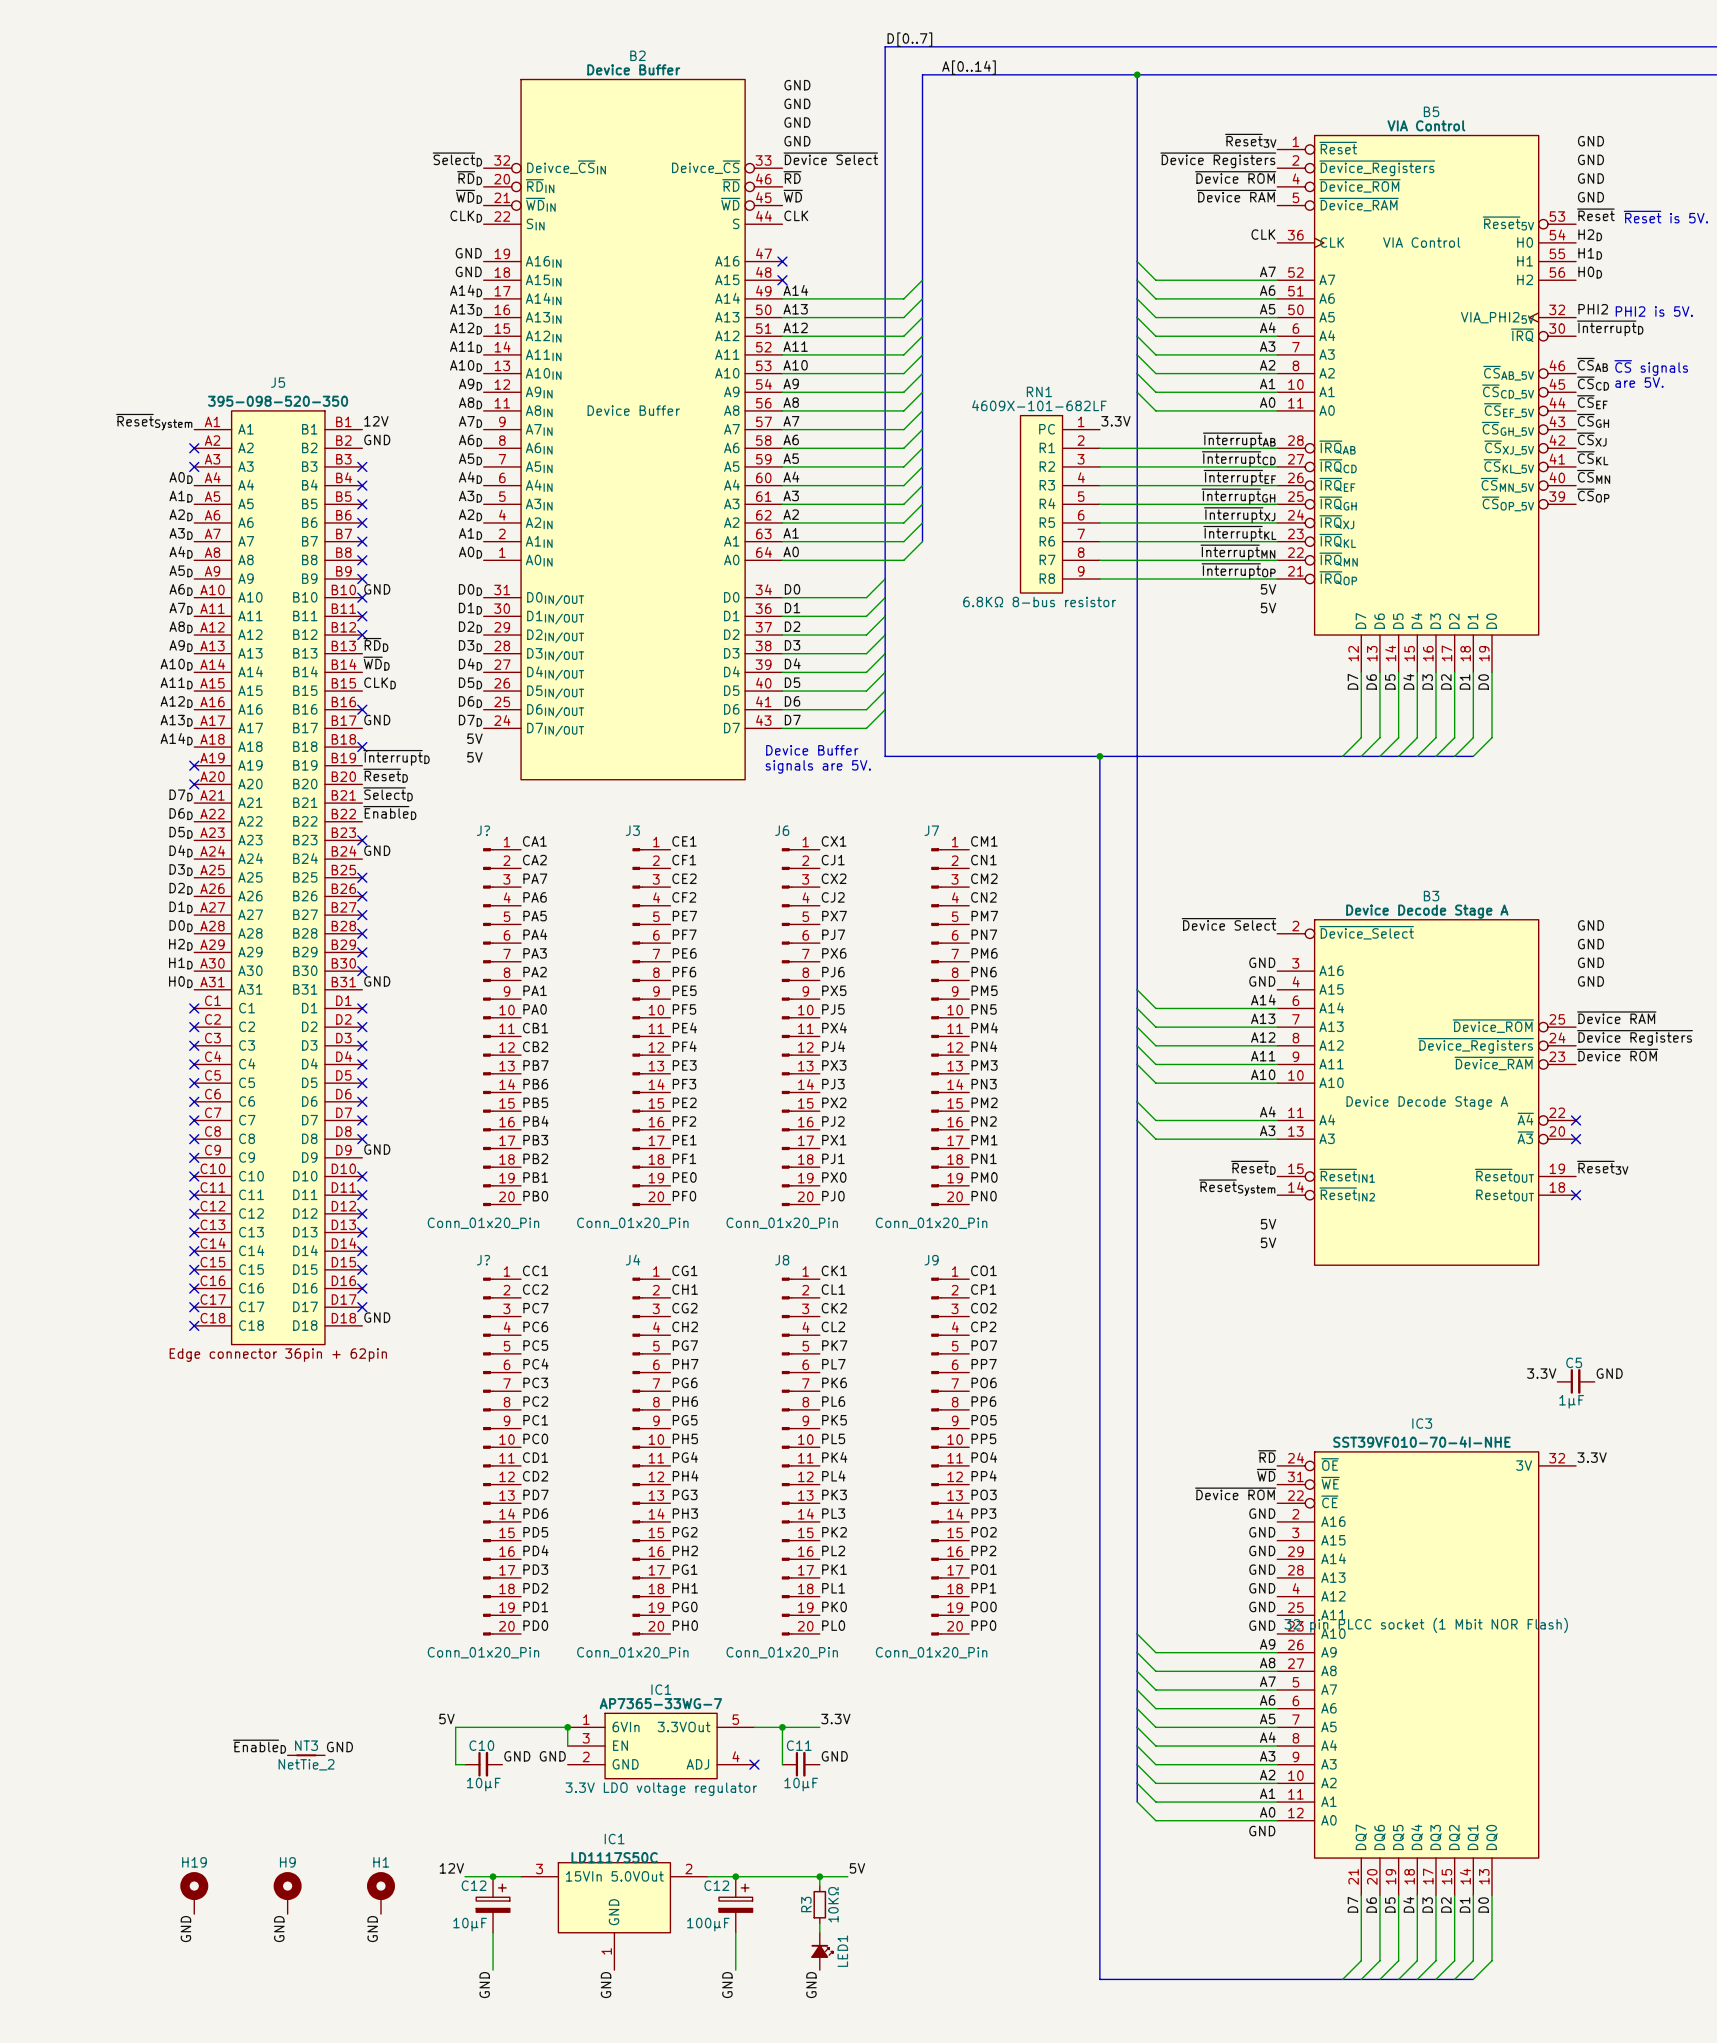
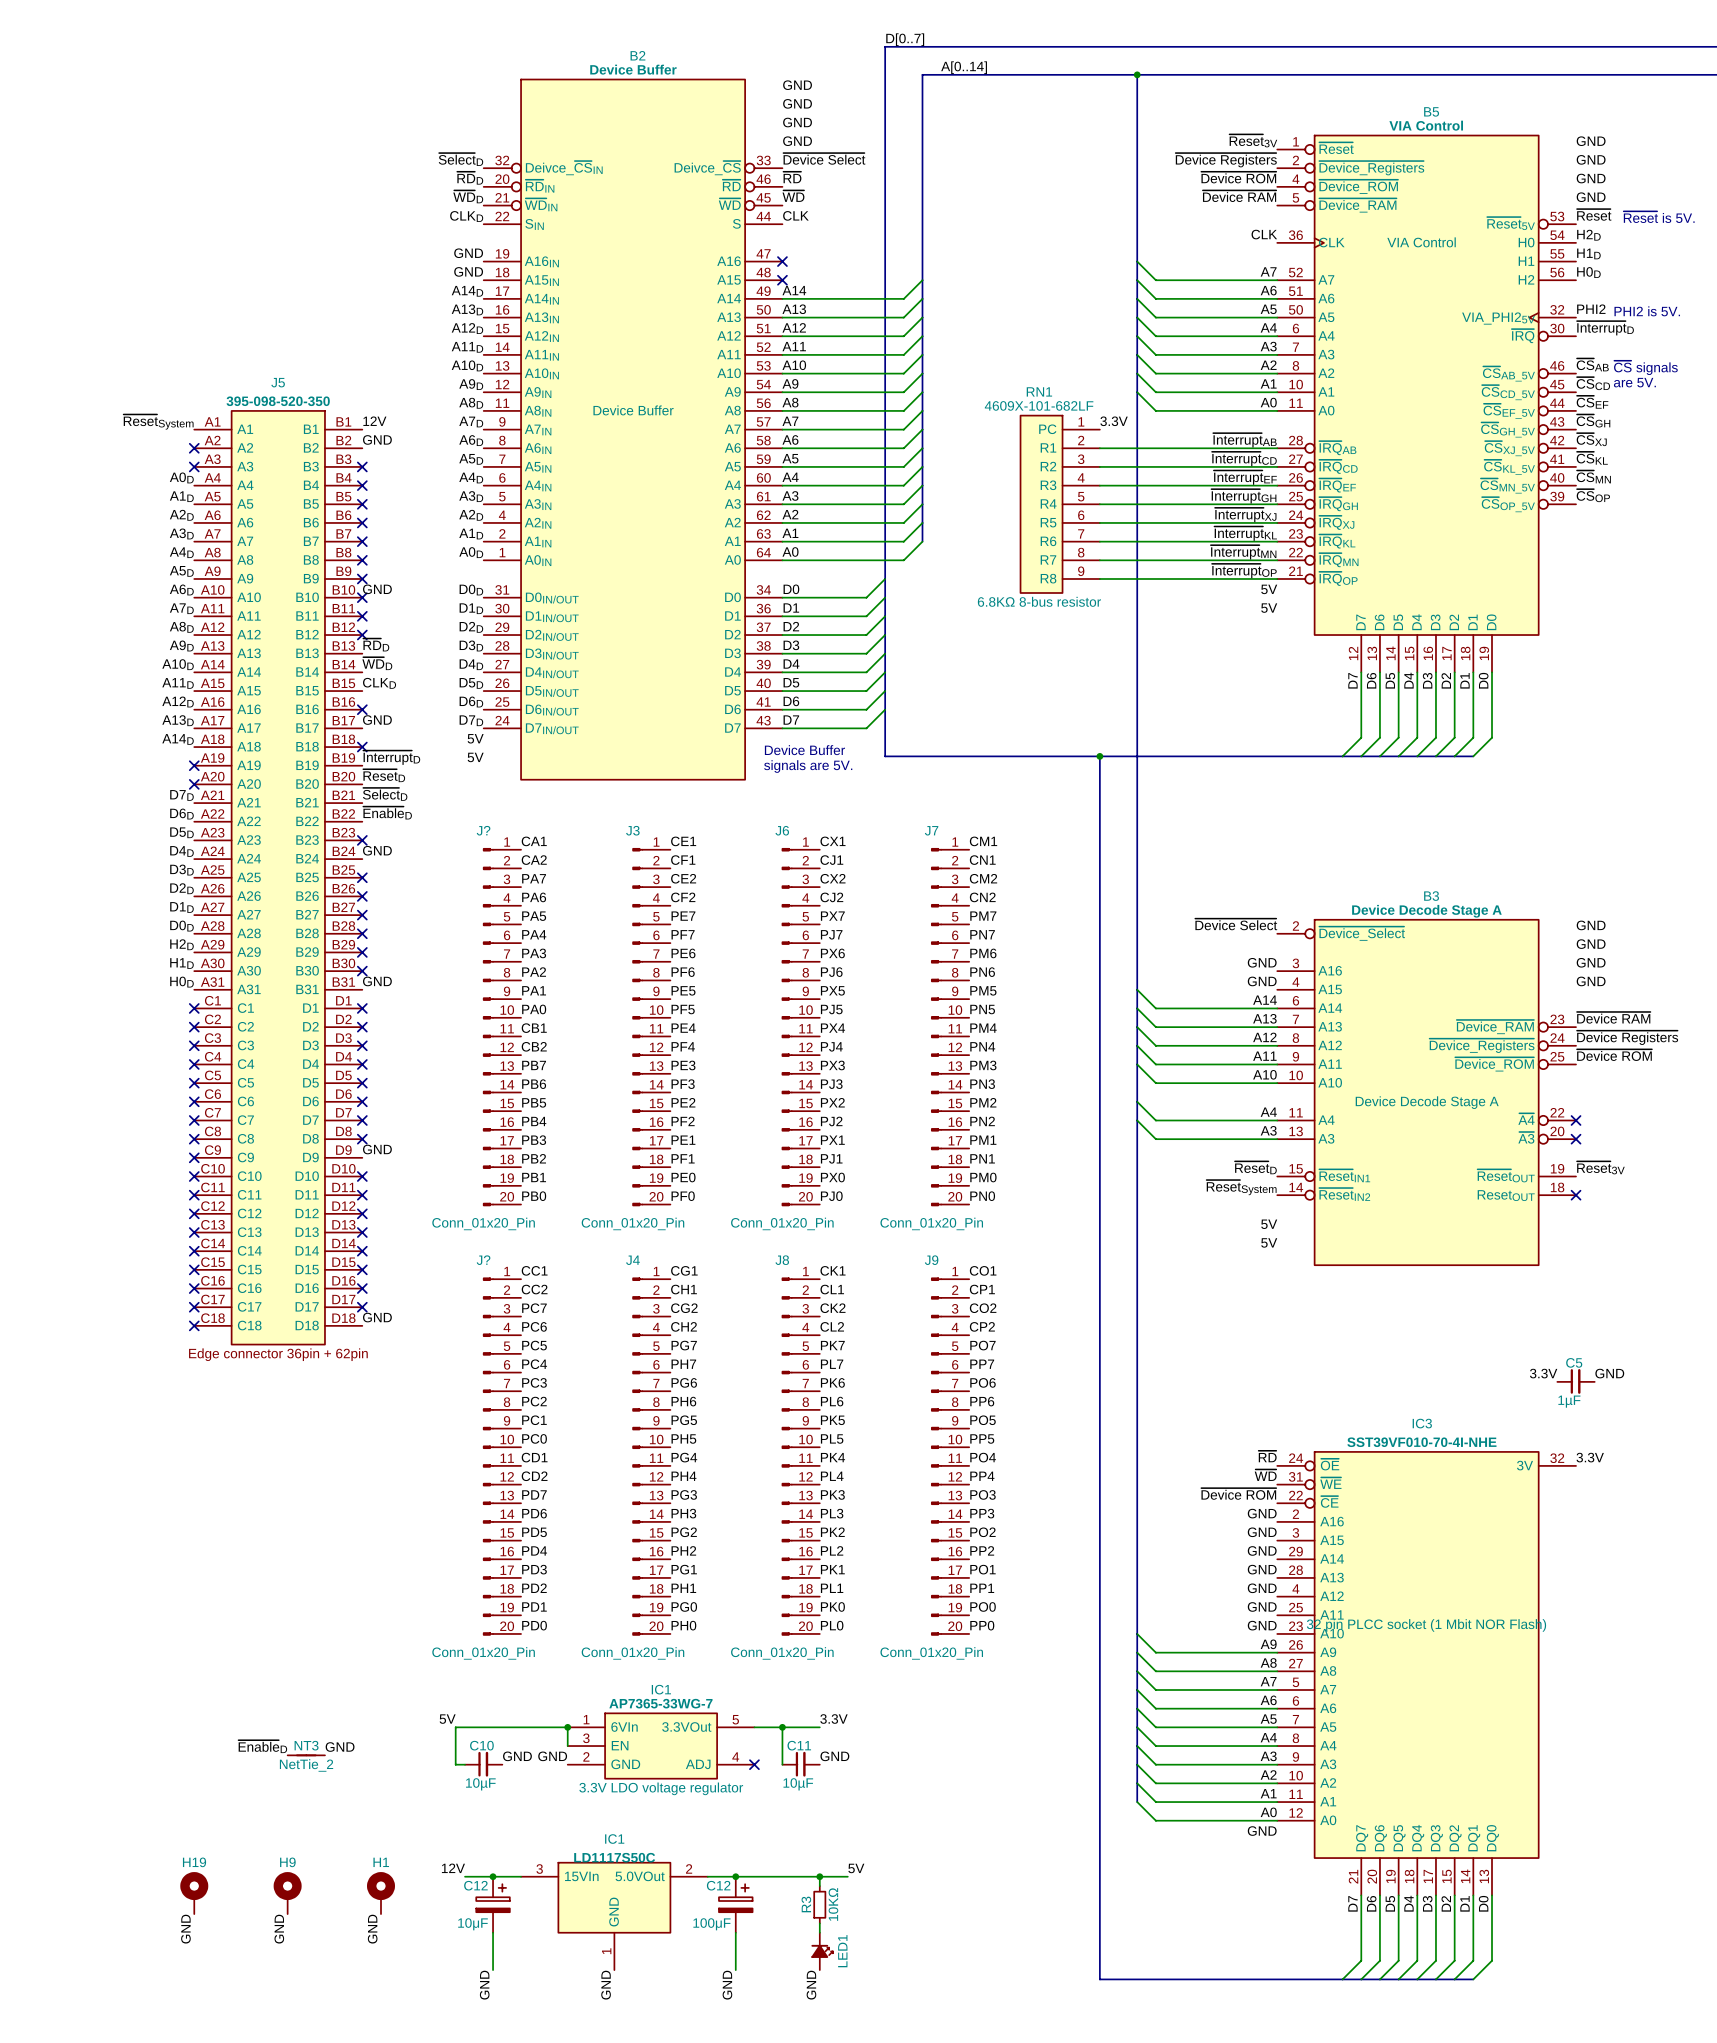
B3 pin number: 25 (1557, 1019) -> 23 (1557, 1019)
B3 pin name: ~{Device_ROM} (1493, 1026) -> ~{Device_RAM} (1495, 1027)
B3 pin number: 23 (1557, 1056) -> 25 (1557, 1056)
B3 pin name: ~{Device_RAM} (1494, 1063) -> ~{Device_ROM} (1494, 1064)

